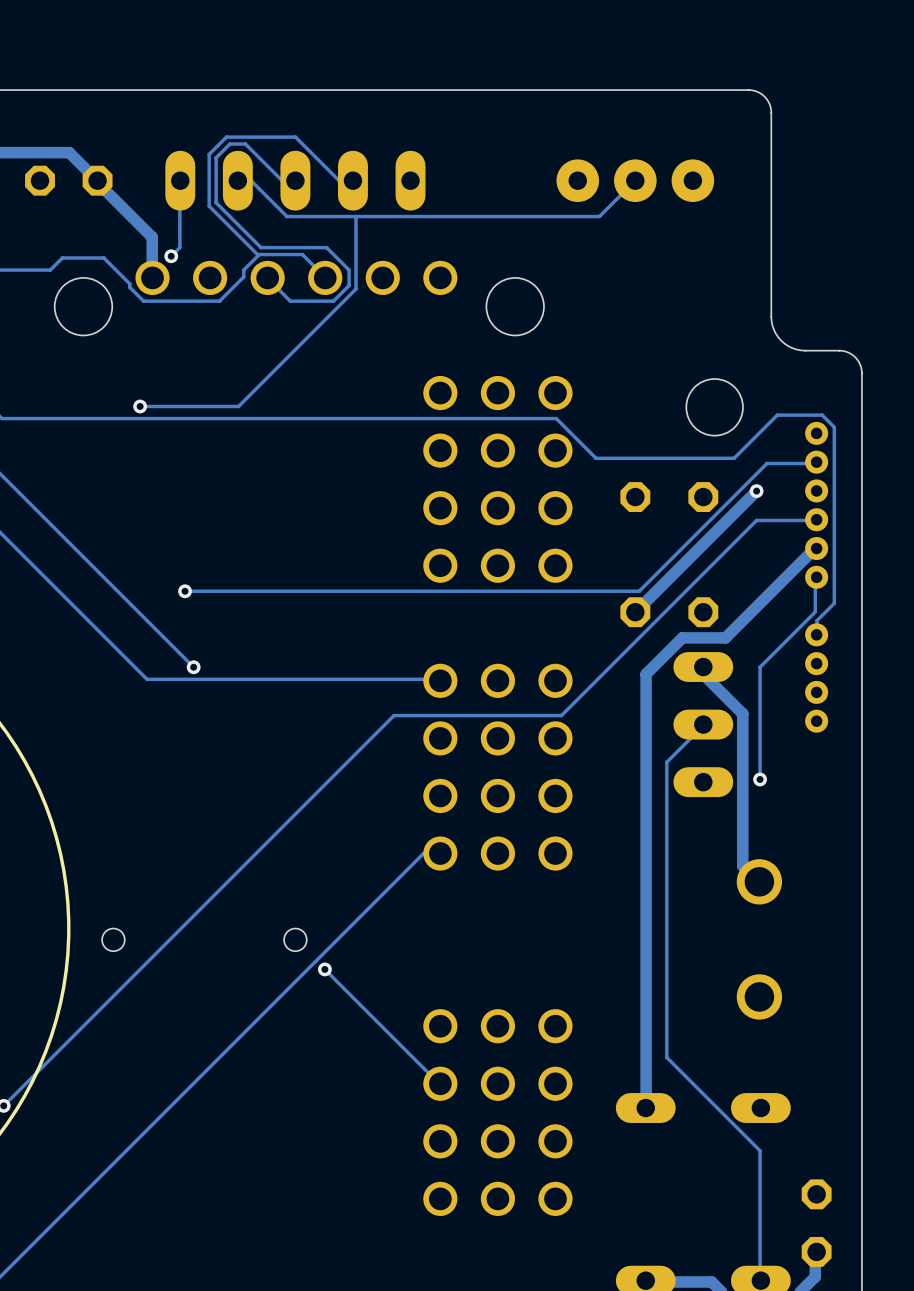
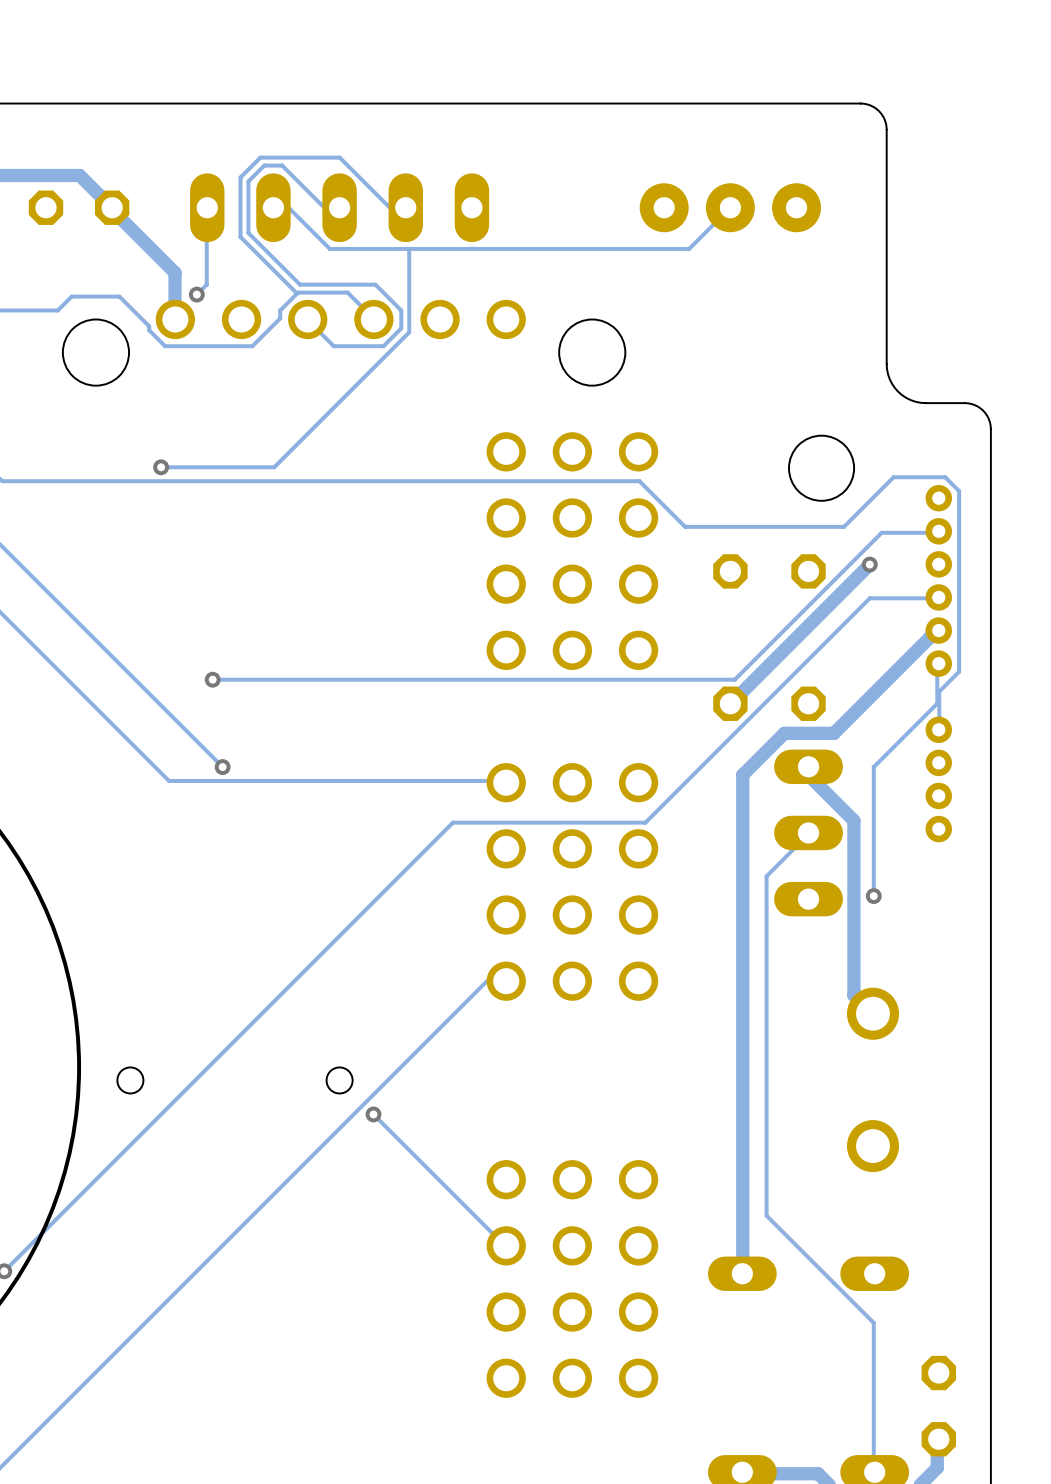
track: (834, 584) (834, 603) (817, 620) -> (959, 671) (939, 691) (939, 713)

